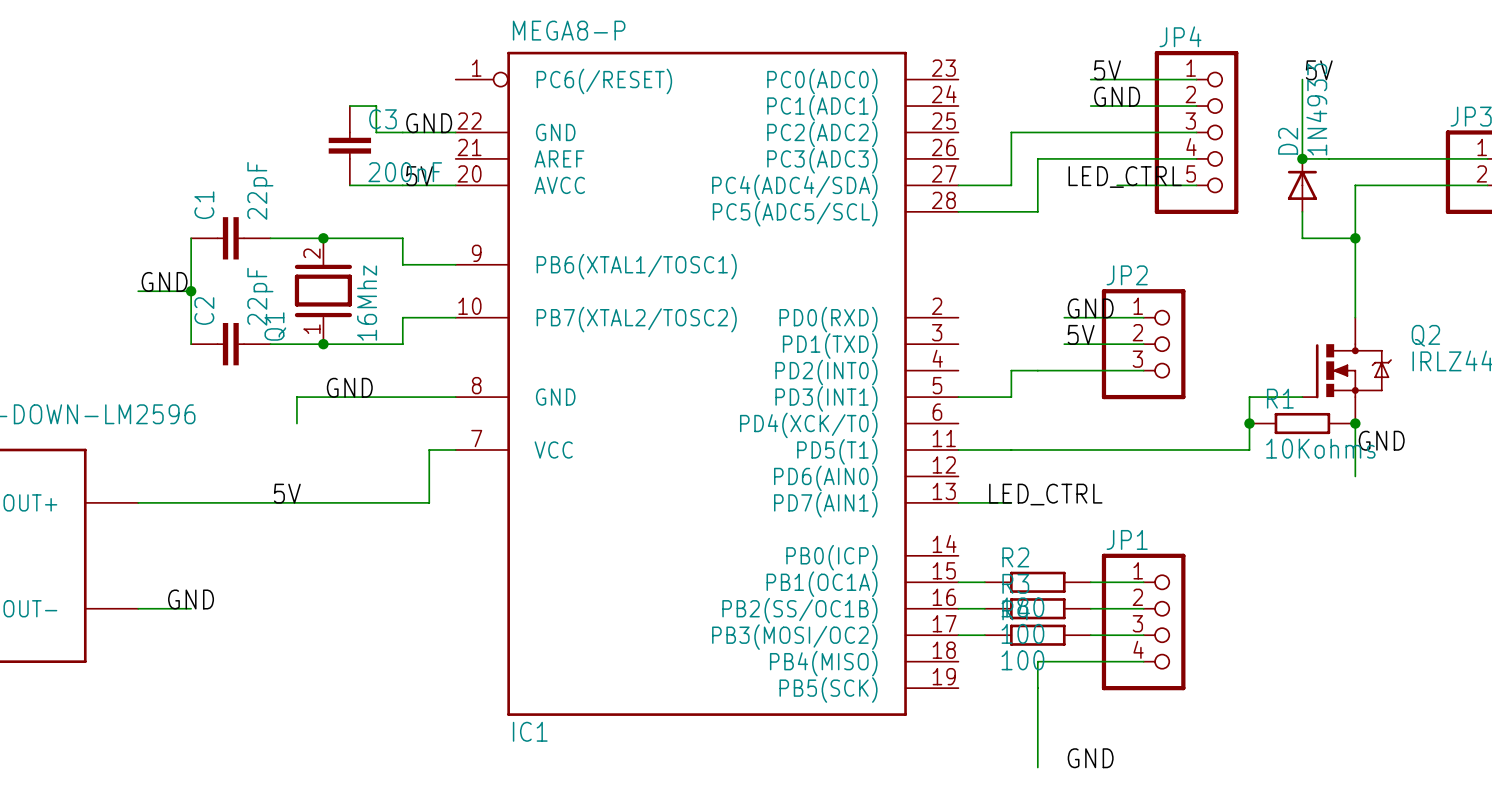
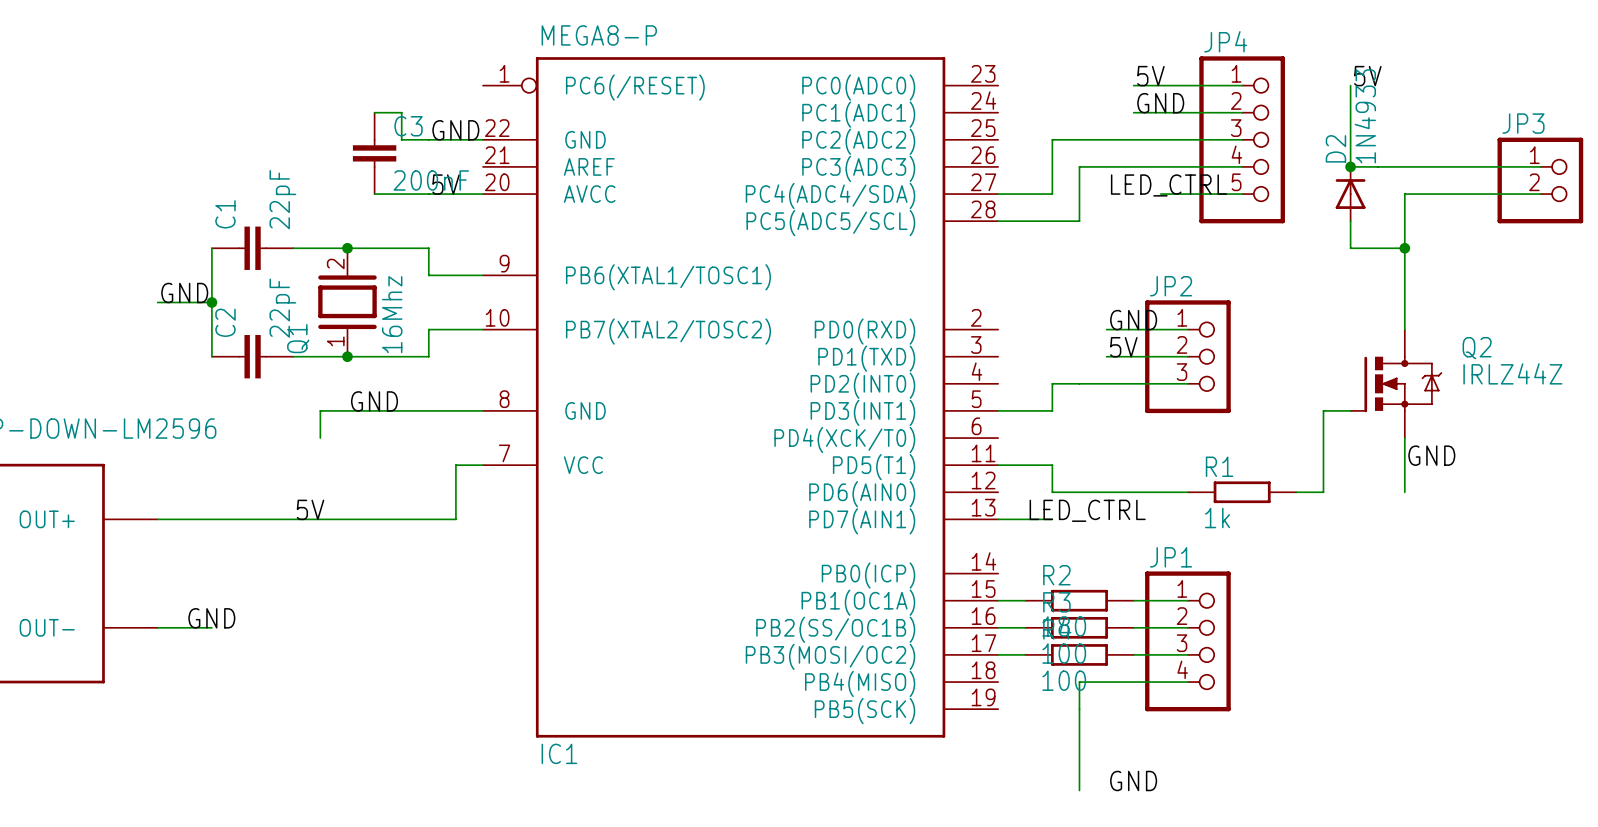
wire: (1275, 397) (1249, 397) (1249, 449) (1011, 449) -> (1187, 492) (1052, 492) (1052, 465)
wire: none -> (1323, 410) (1323, 492) (1296, 492)
junction: (1249, 423) -> none
R1 position: (1302, 423) -> (1242, 492)
junction: (1355, 423) -> none
R1 value: 10Kohms (1320, 448) -> 1k (1217, 518)

